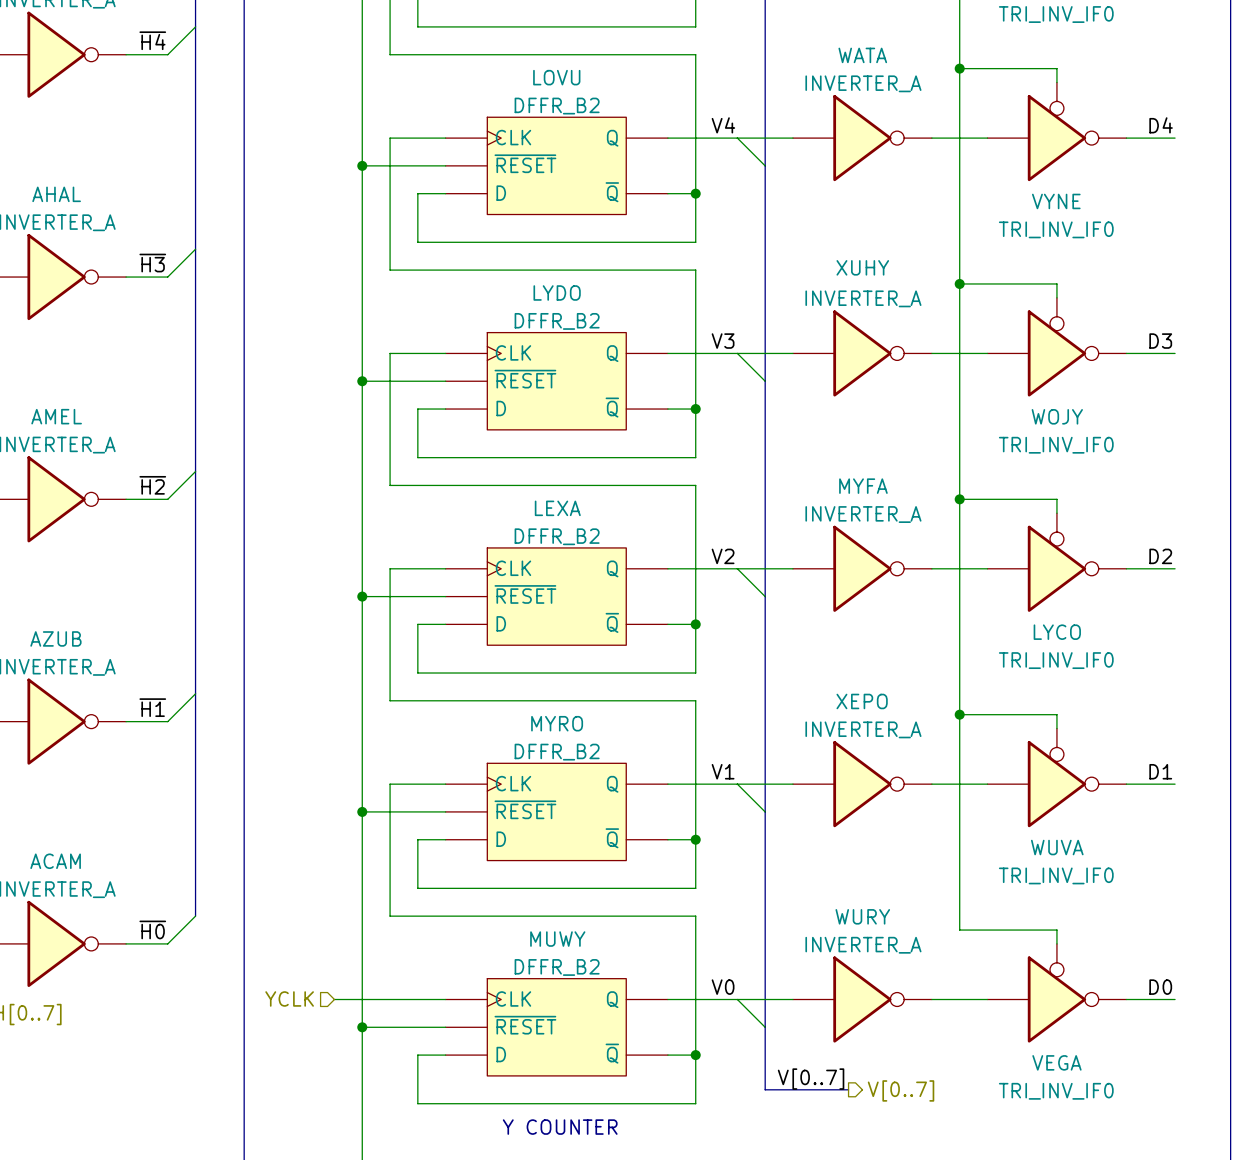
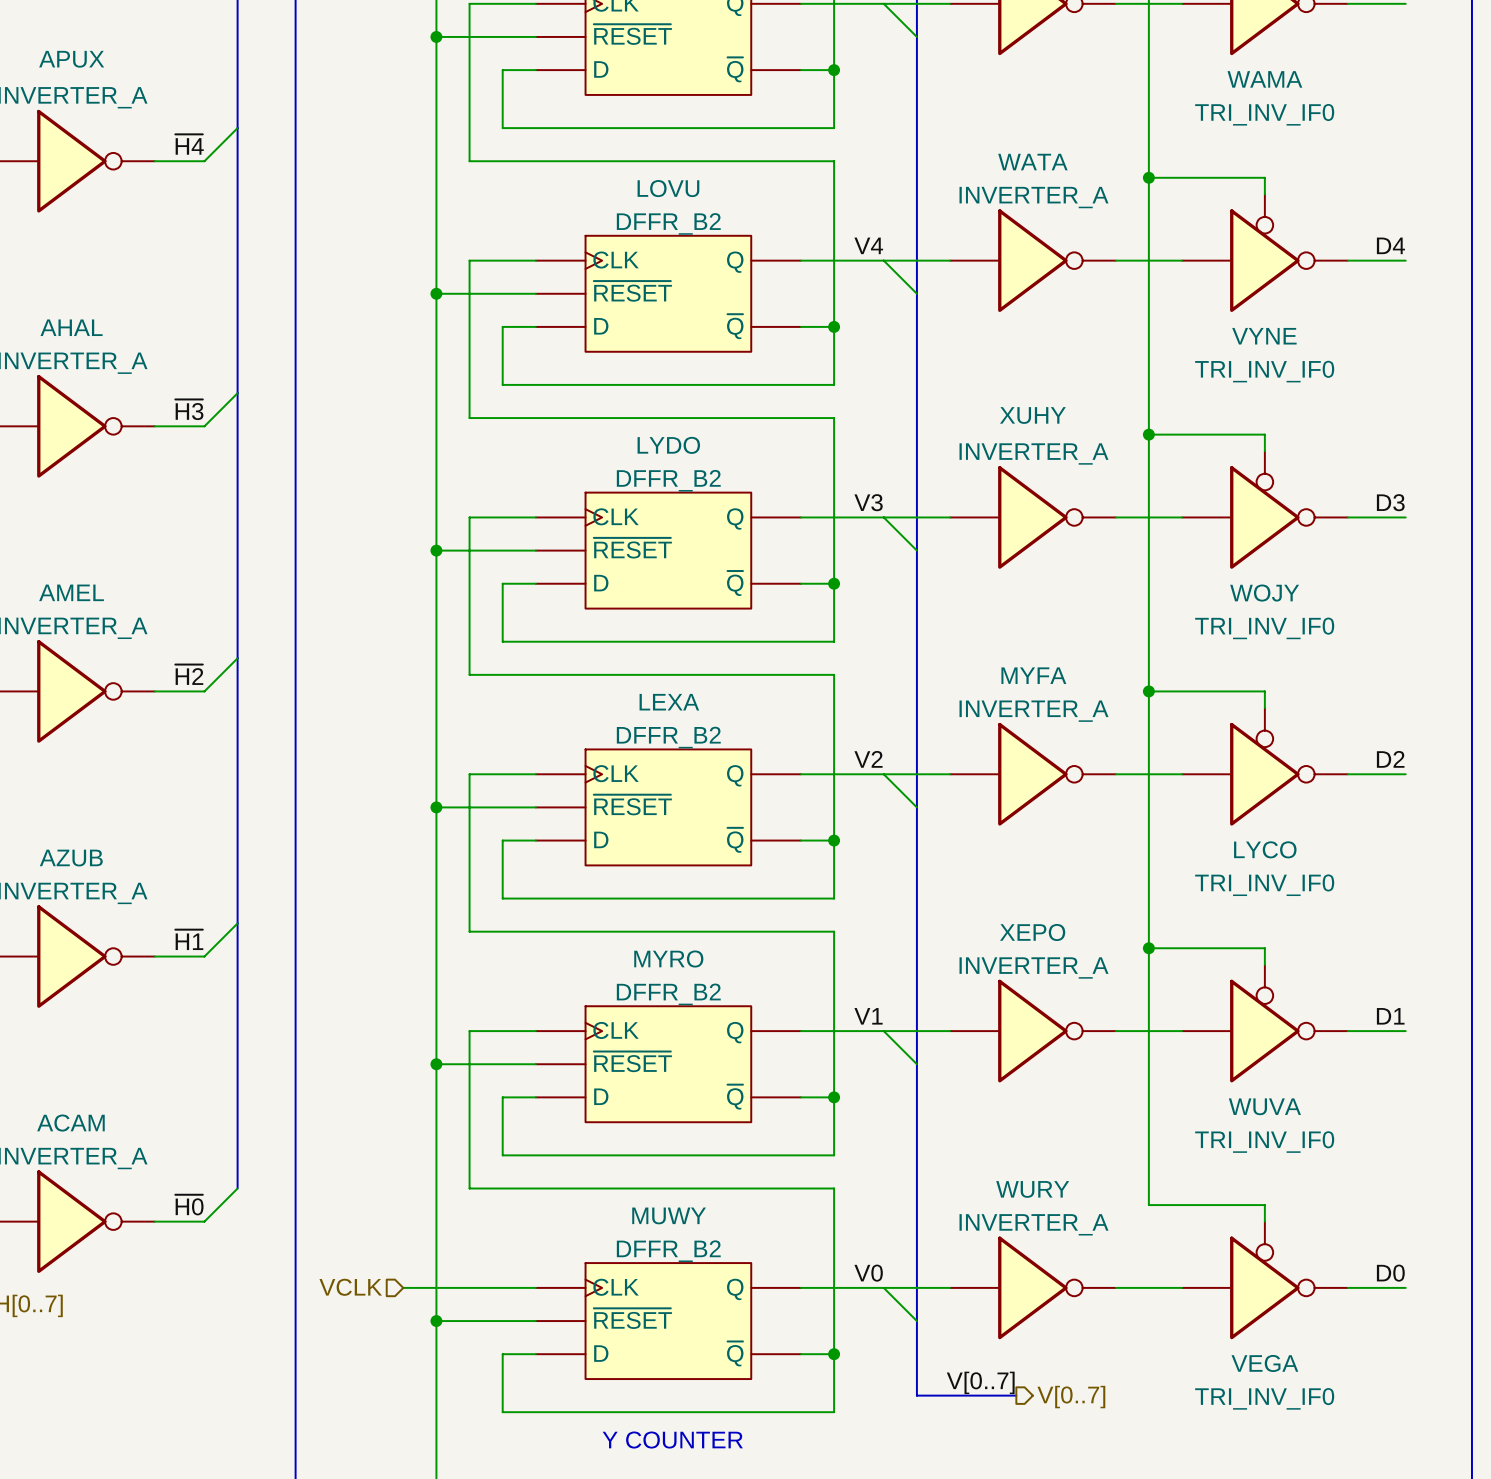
hierarchical label: YCLK (289, 998) -> VCLK (350, 1287)

